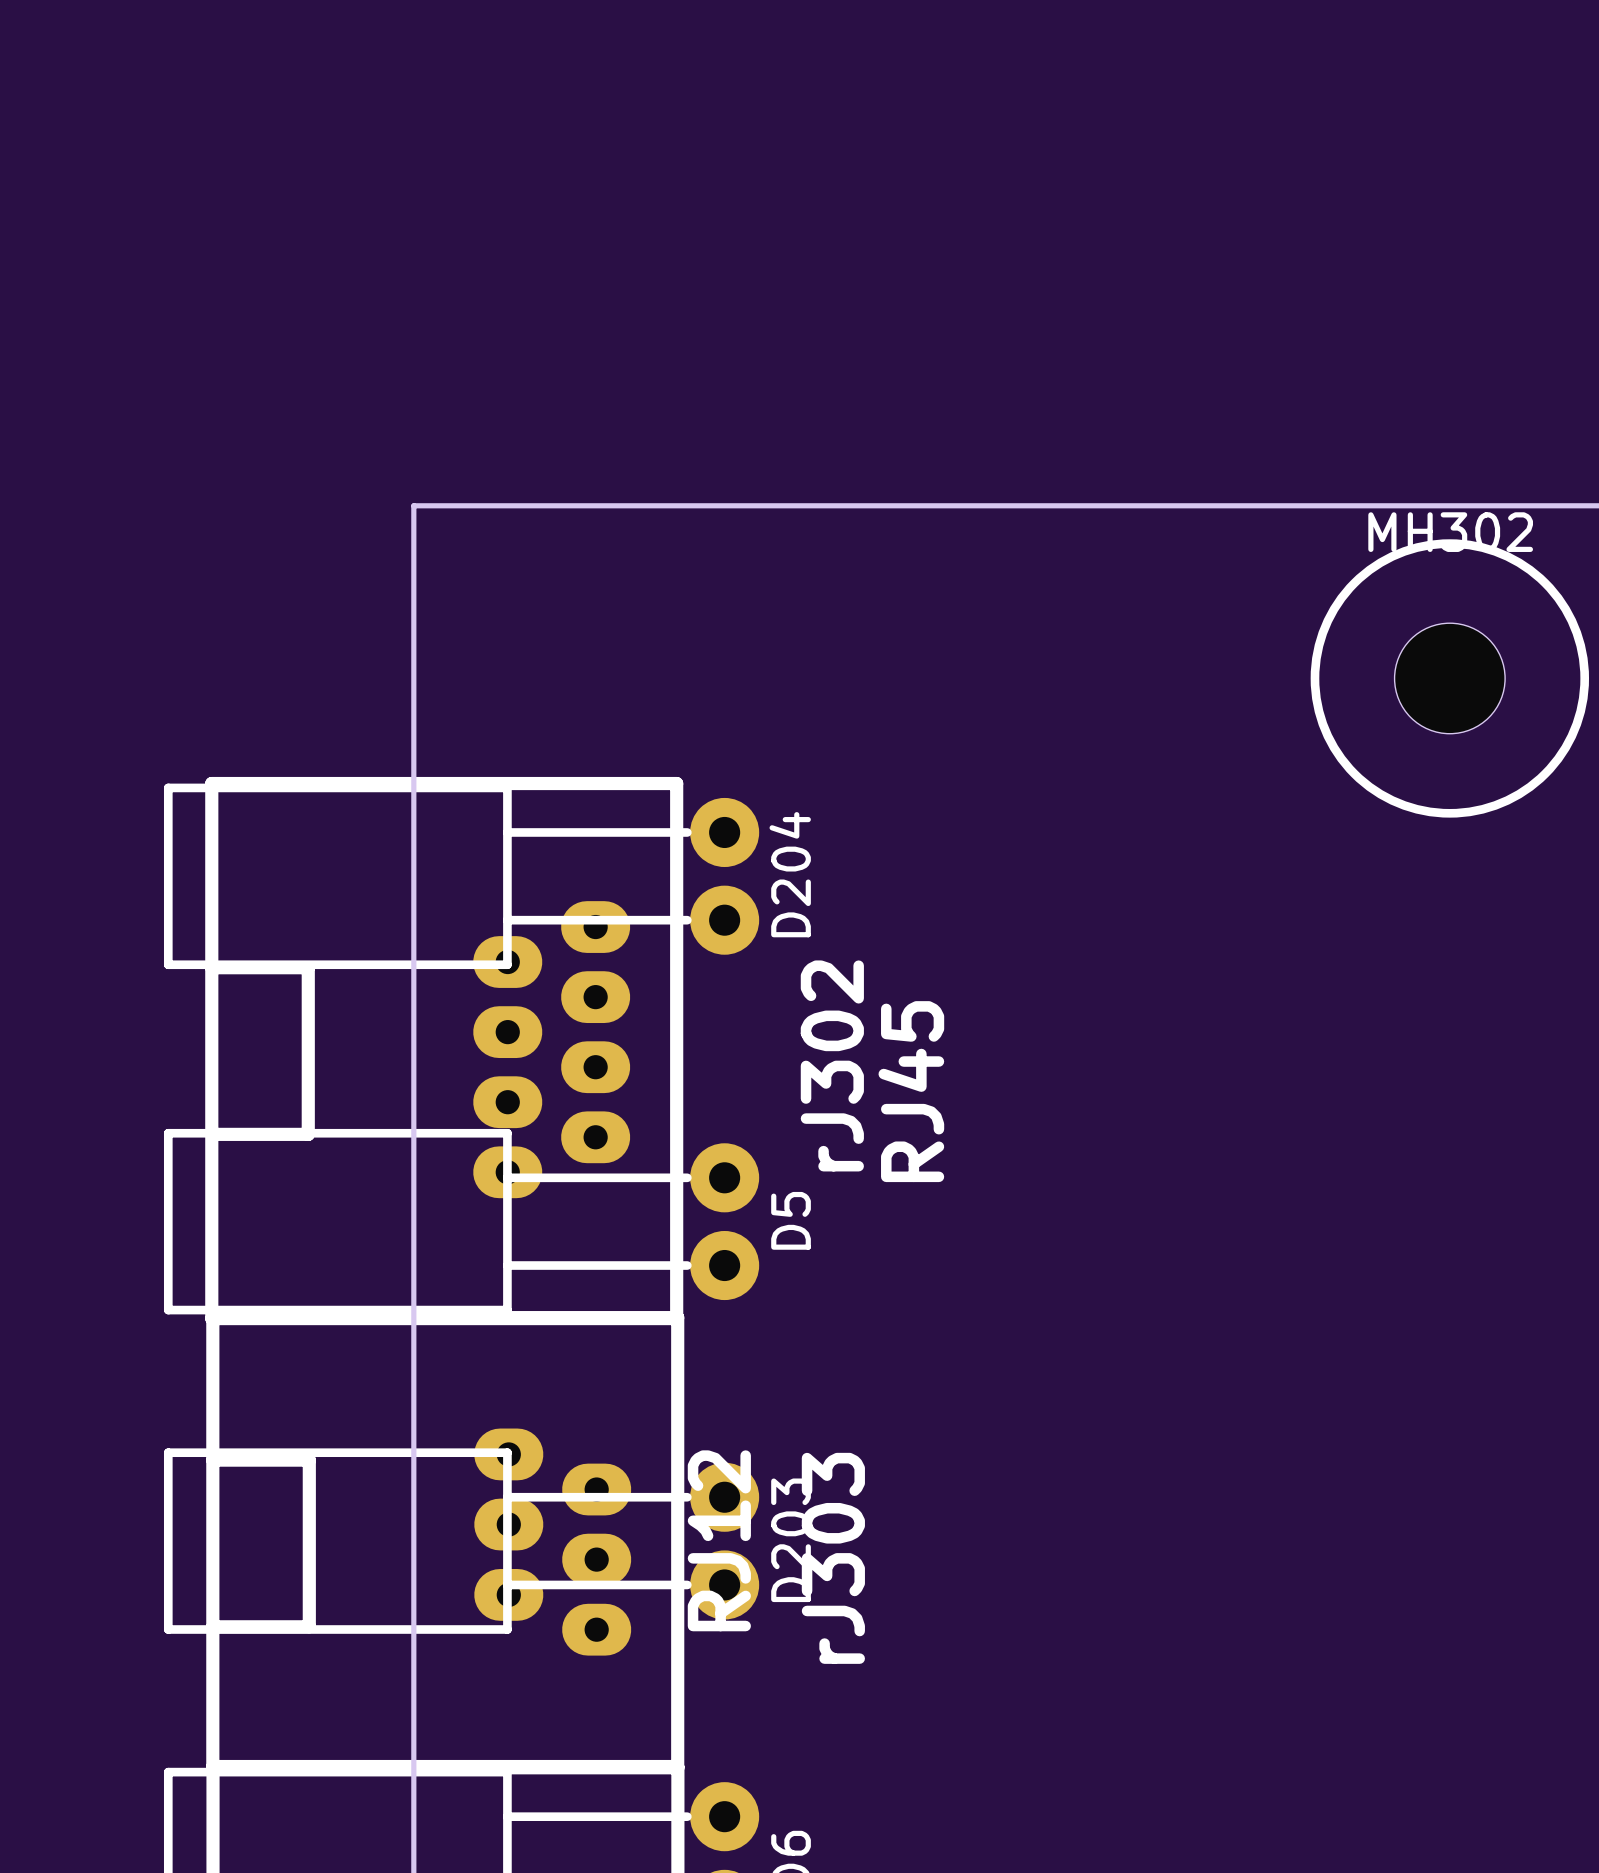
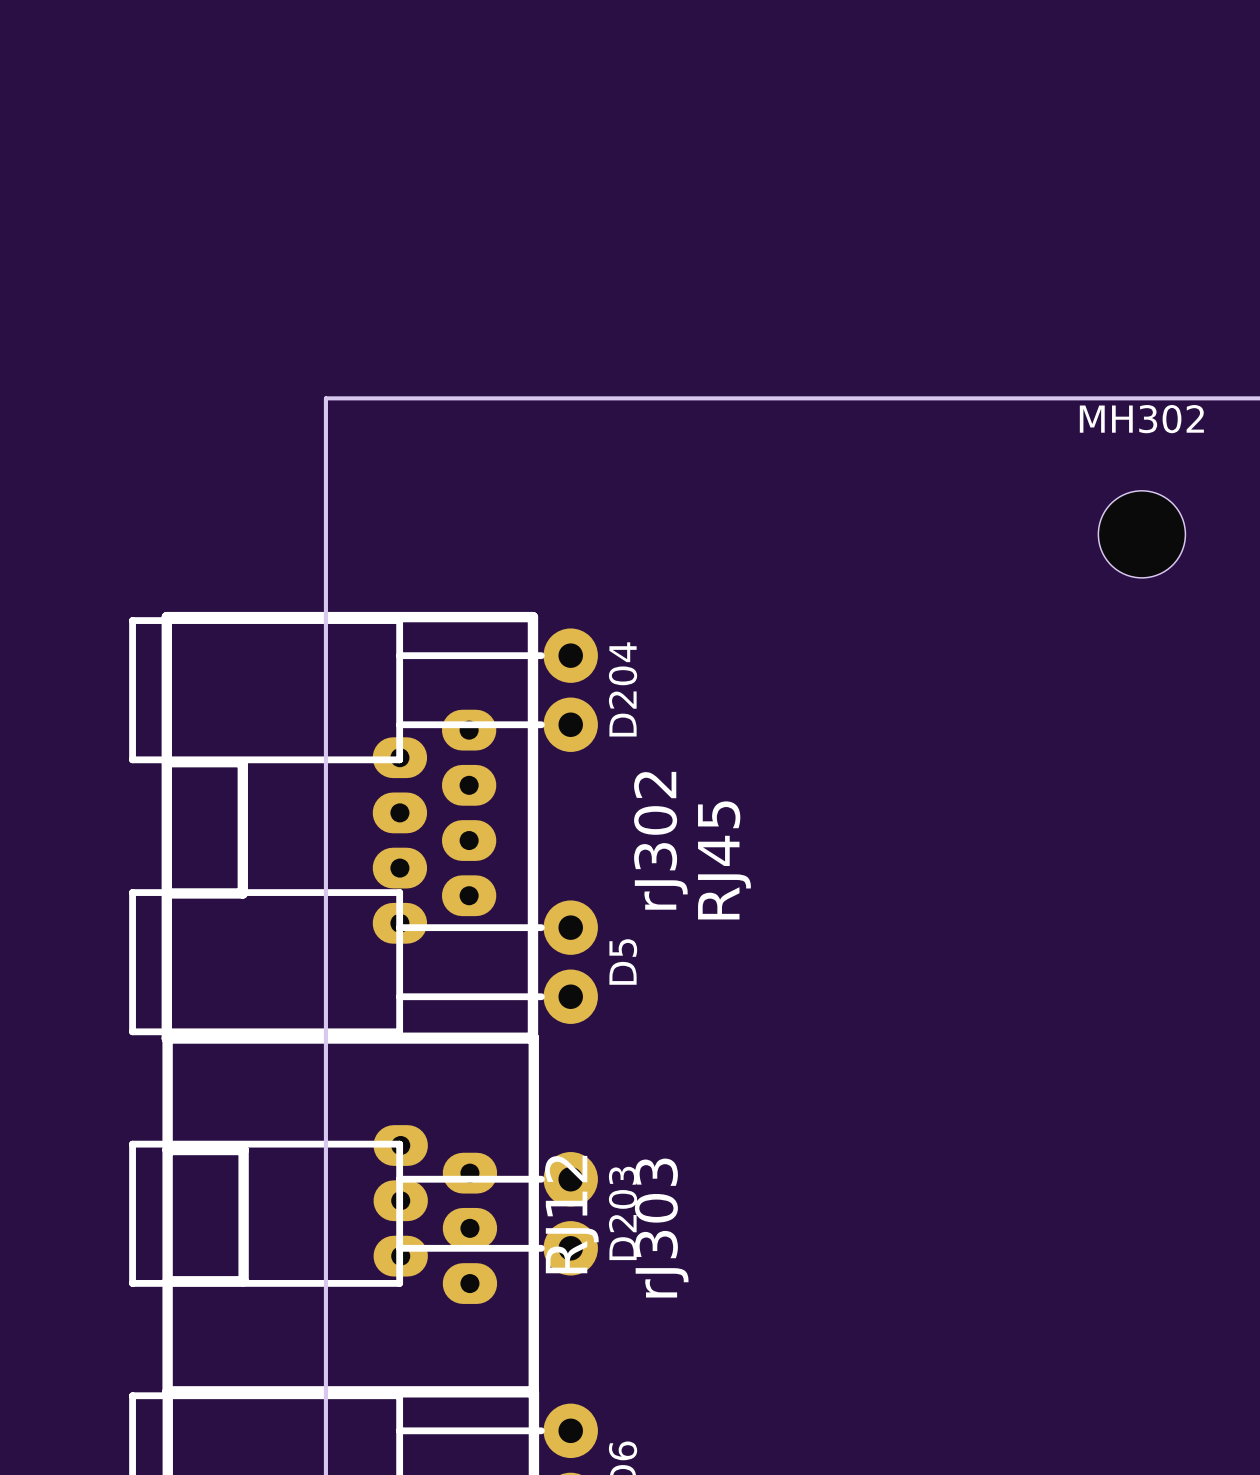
MH302 footprint: [1310, 539, 1590, 818] -> [1098, 490, 1186, 578]

